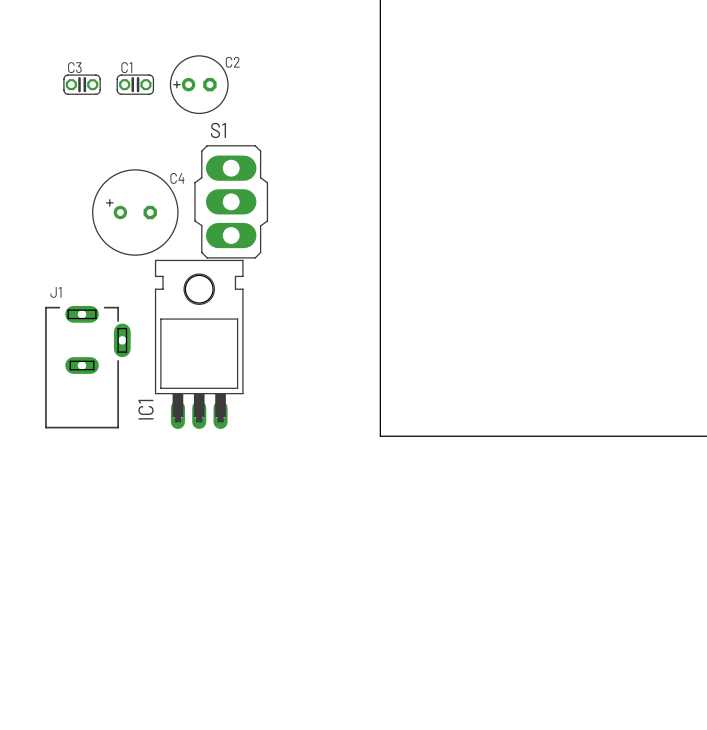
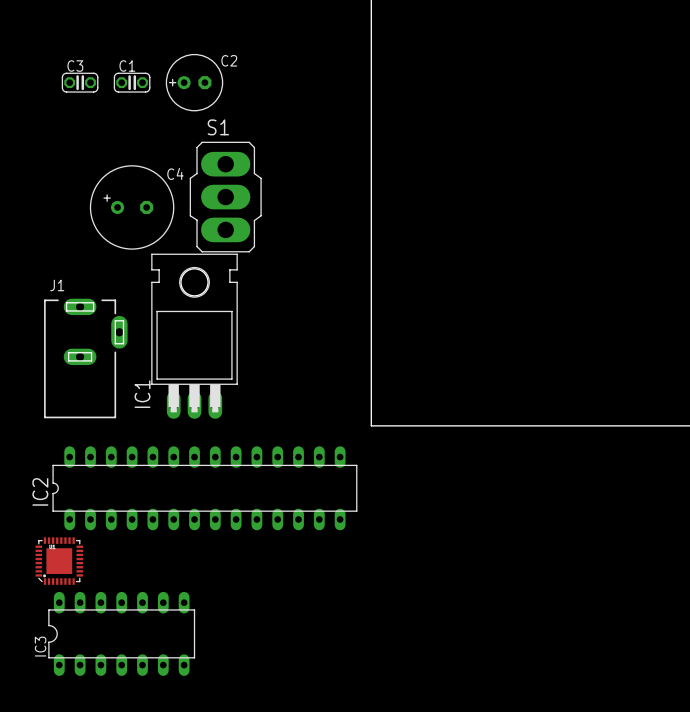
IC2: none -> (204, 488)
part: none -> (59, 561)
IC3: none -> (121, 633)

